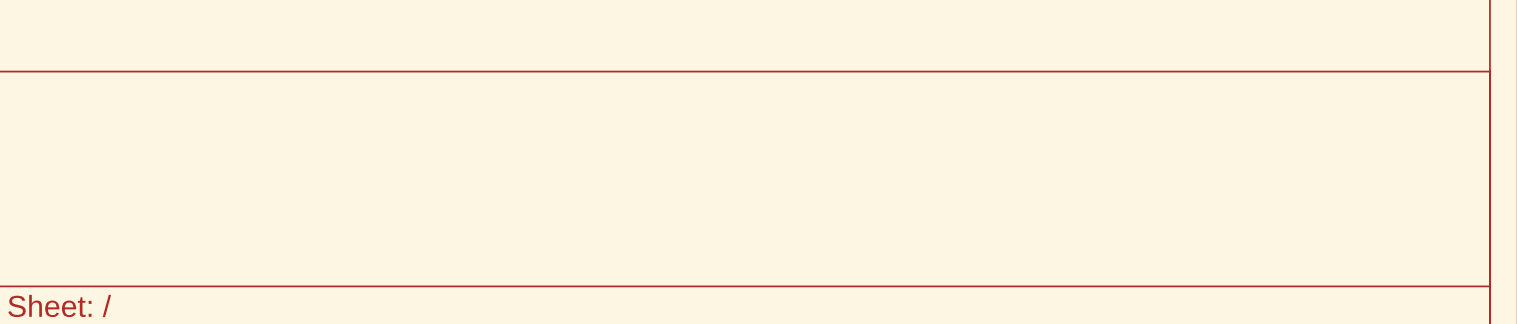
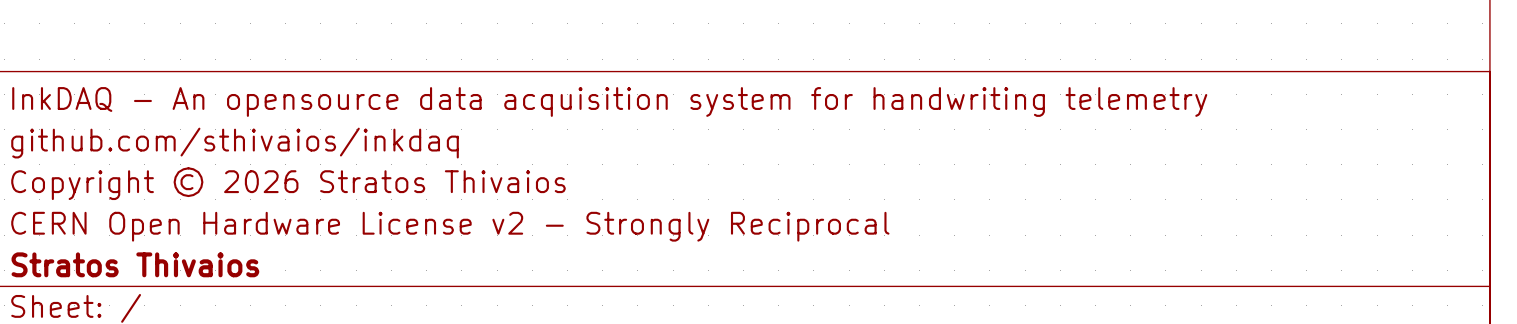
title block: none -> InkDAQ - An opensource data acquisition system for handwriting telemetry (609, 101)
title block: none -> github.com/sthivaios/inkdaq (235, 143)
title block: none -> Copyright © 2026 Stratos Thivaios (288, 183)
title block: none -> CERN Open Hardware License v2 - Strongly Reciprocal (450, 226)
title block: none -> Stratos Thivaios (135, 264)

